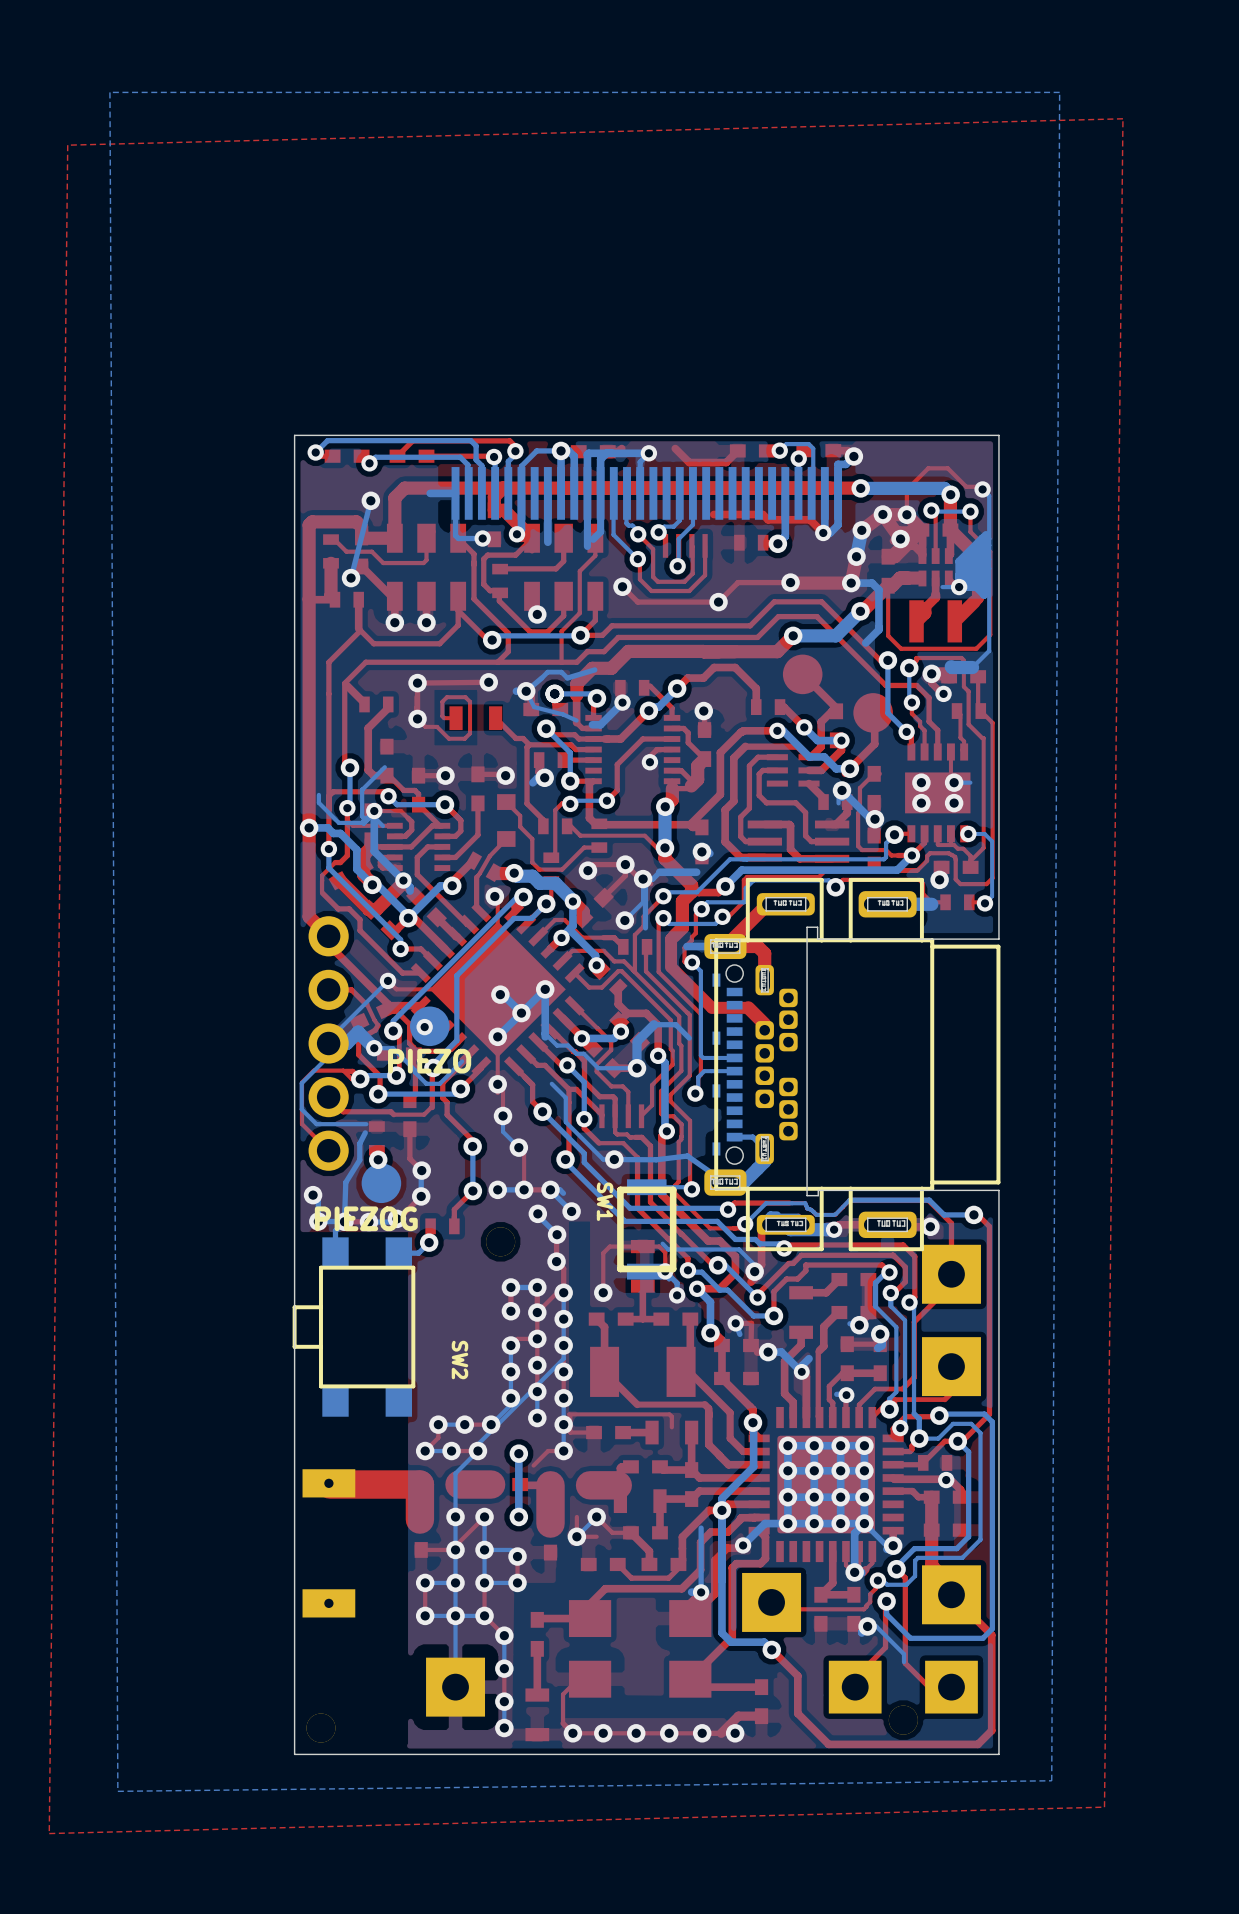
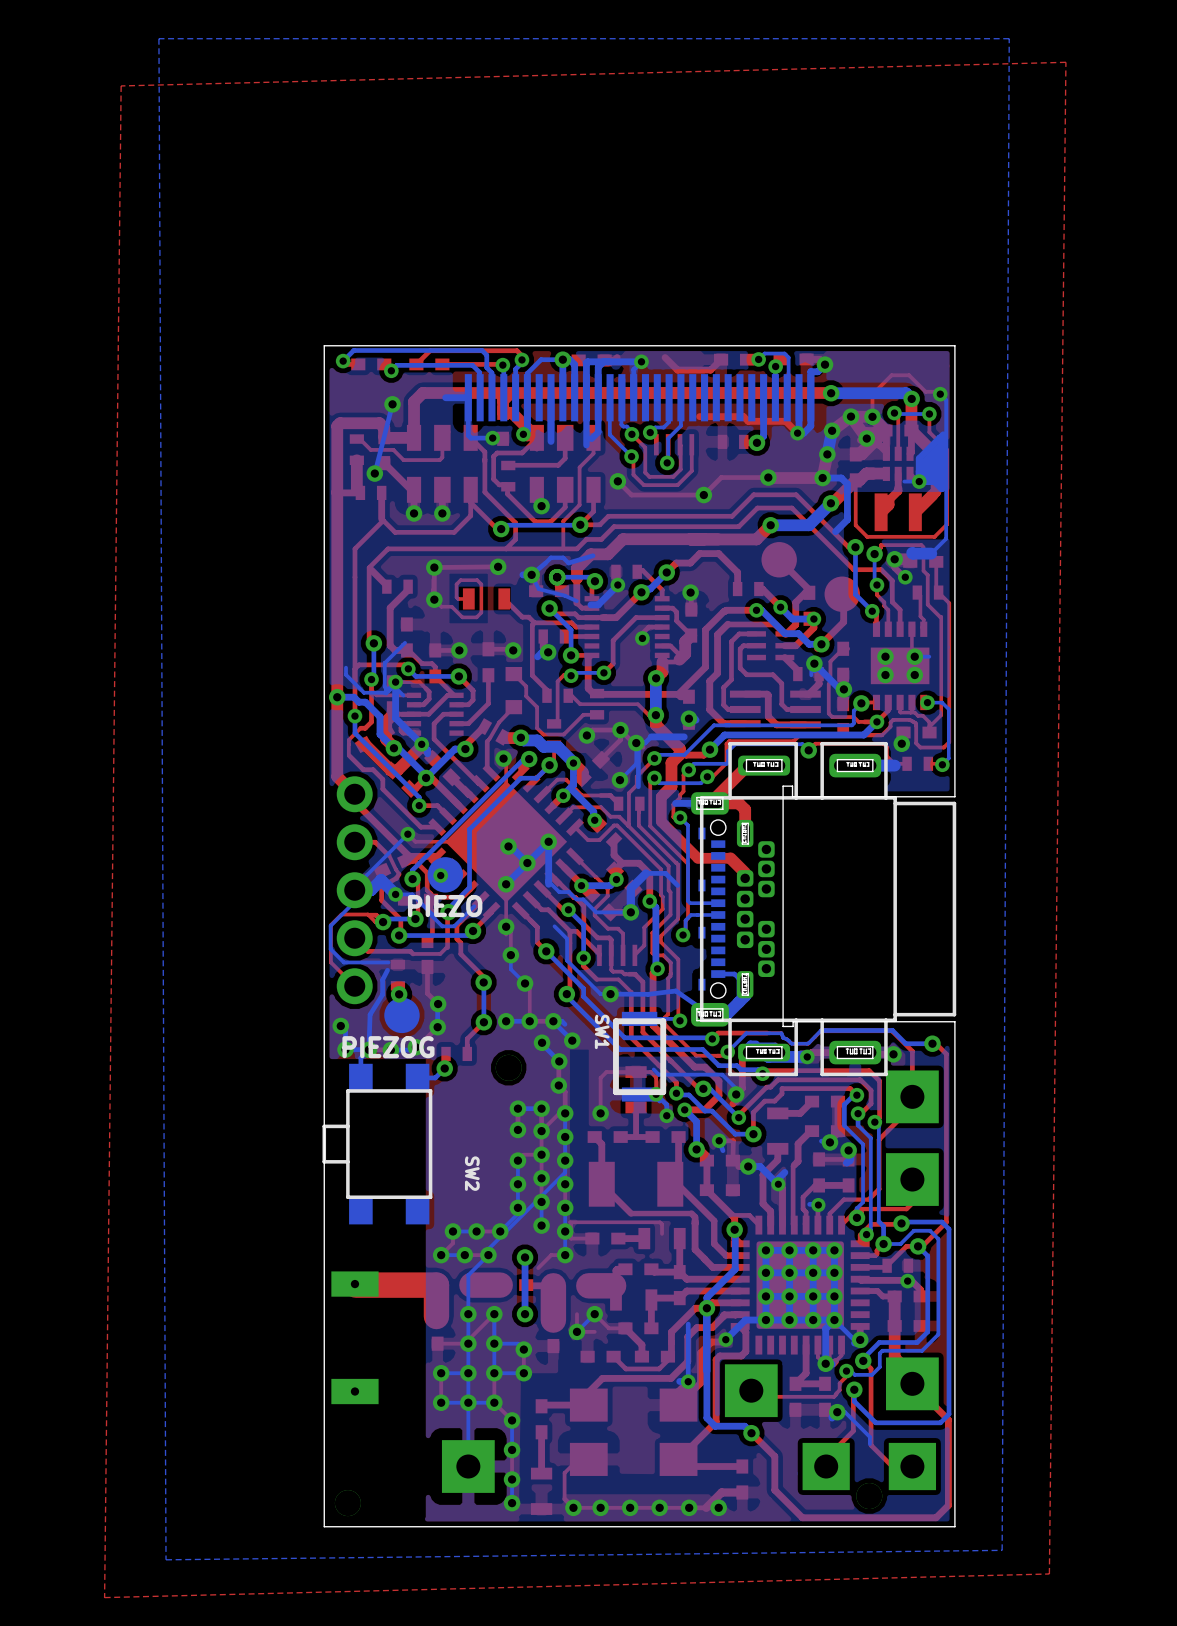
top track: none -> (732, 1215) (749, 1215) (758, 1224)

